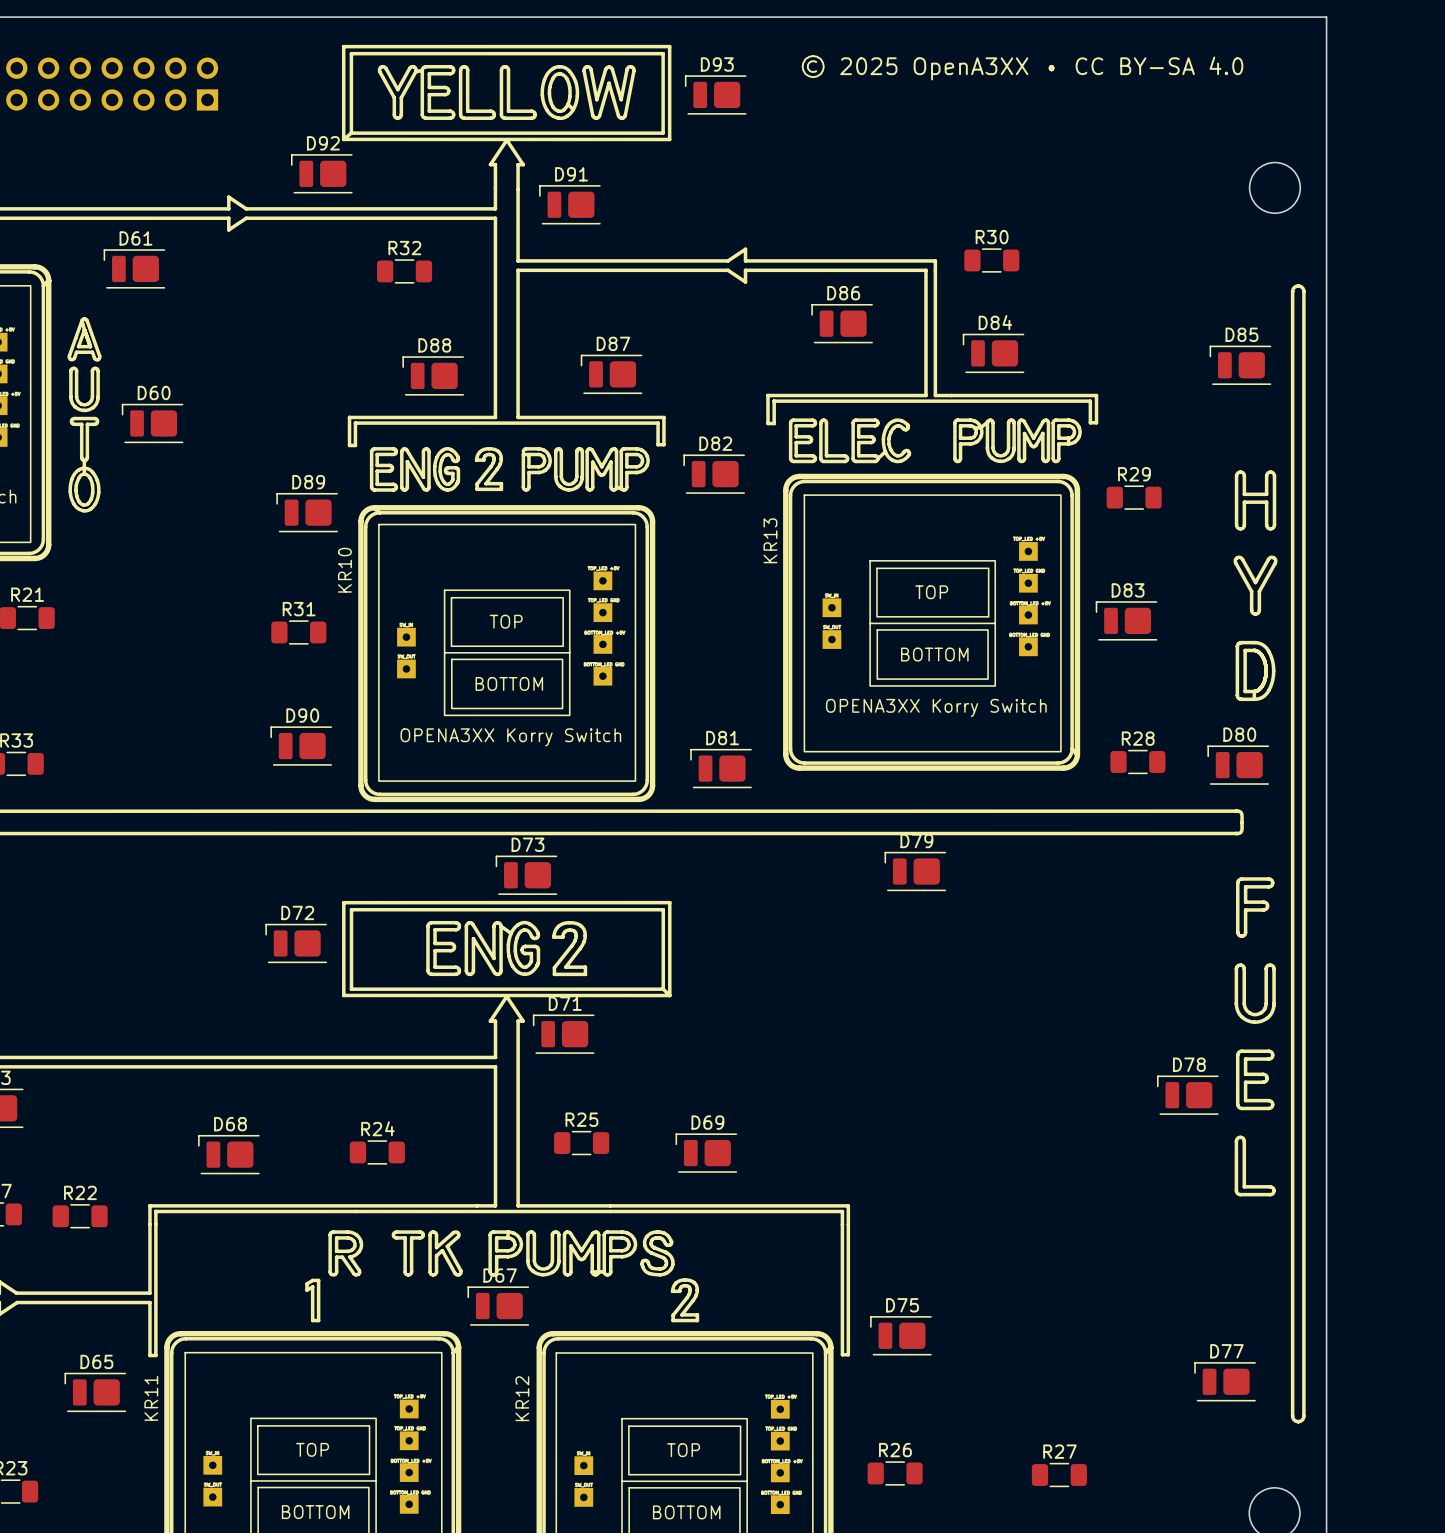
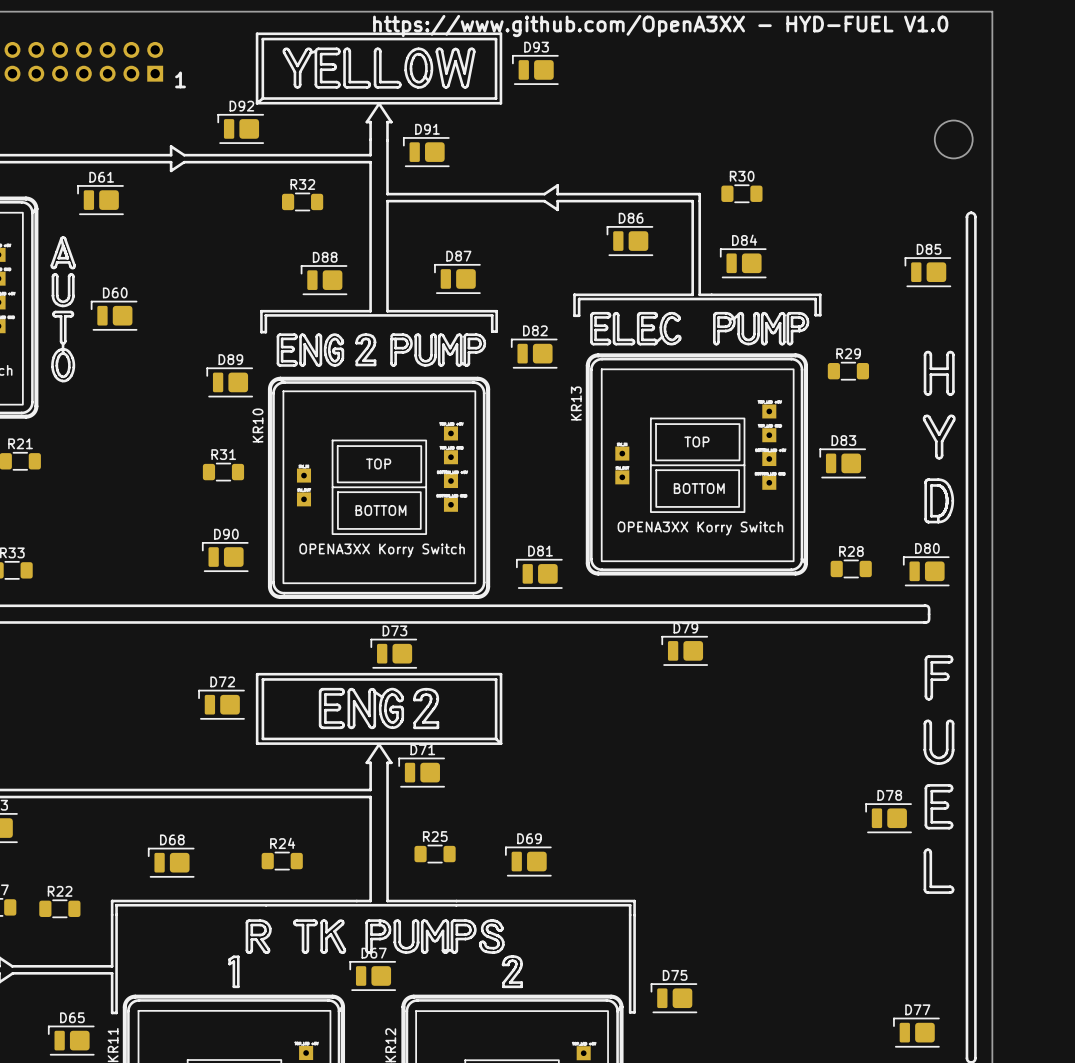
text: none -> https://www.github.com/OpenA3XX - HYD-FUEL V1.0 (660, 26)
text: © 2025 OpenA3XX • CC BY-SA 4.0 (1022, 67) -> none
text: none -> 1 (180, 79)

